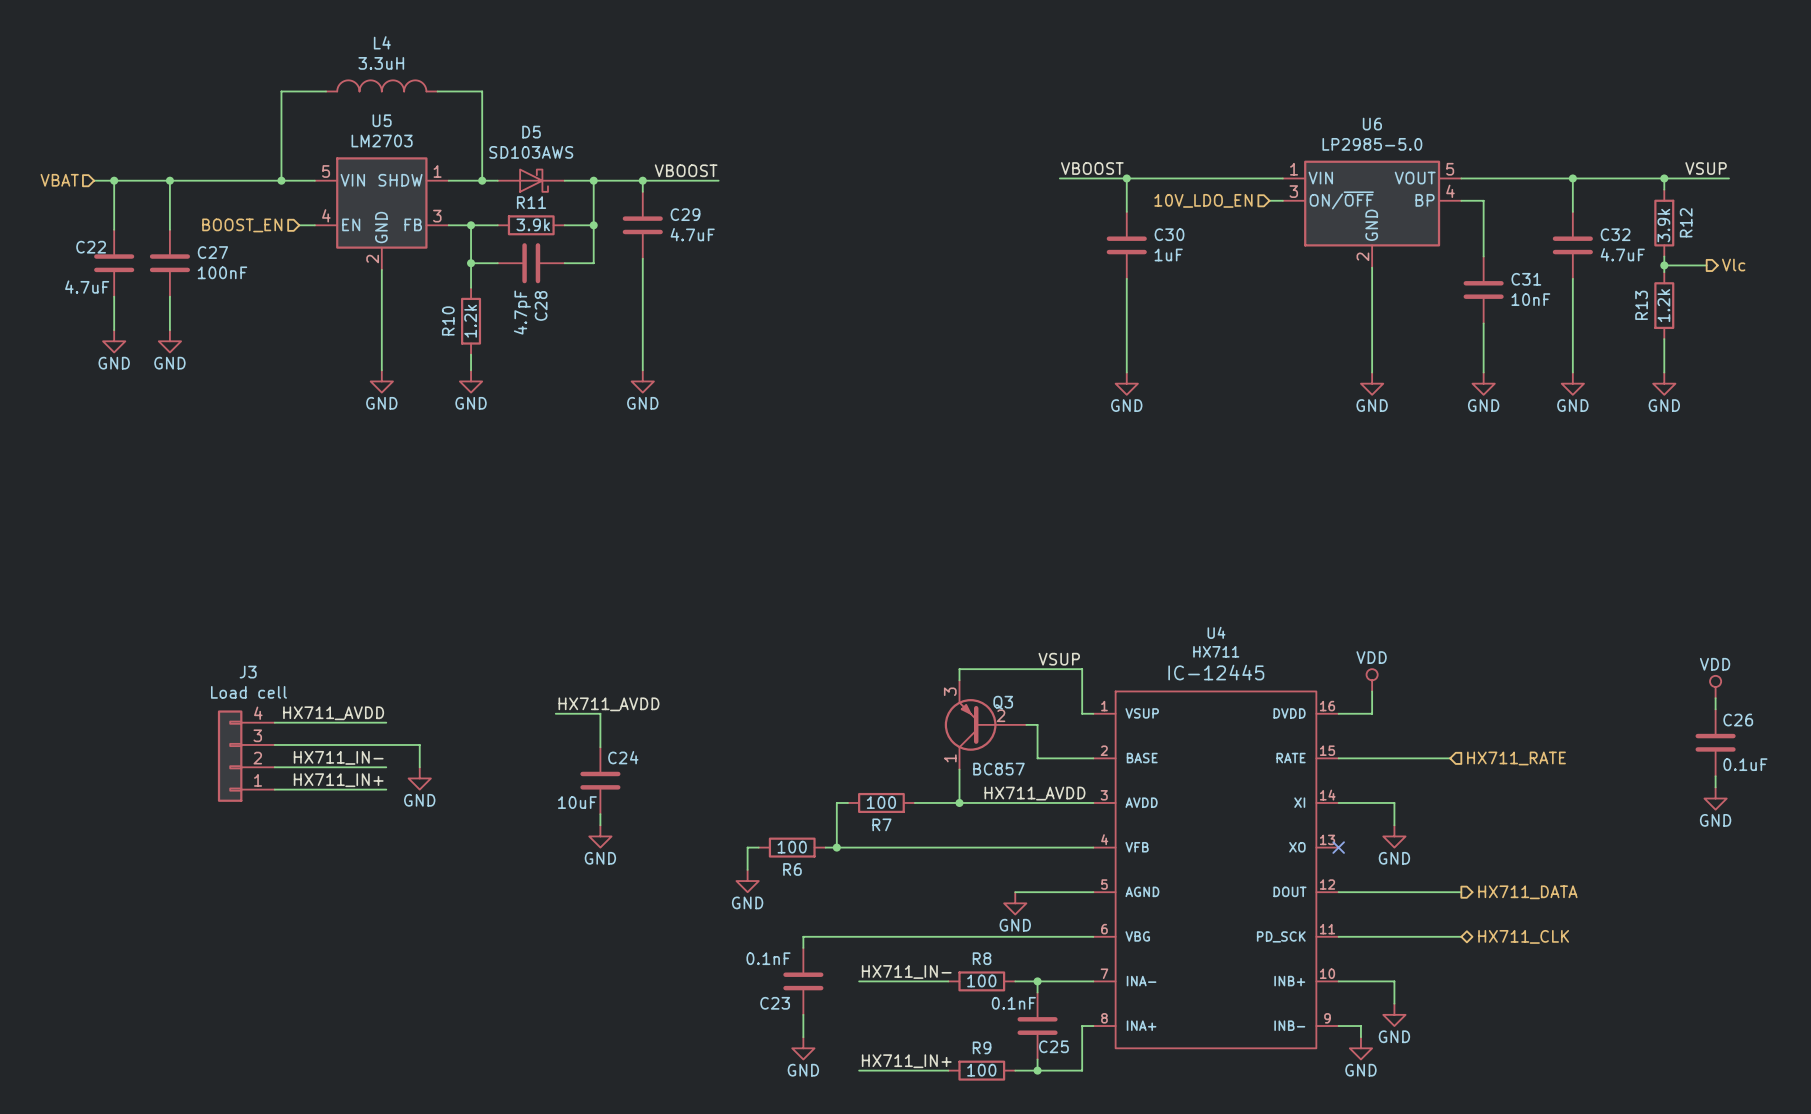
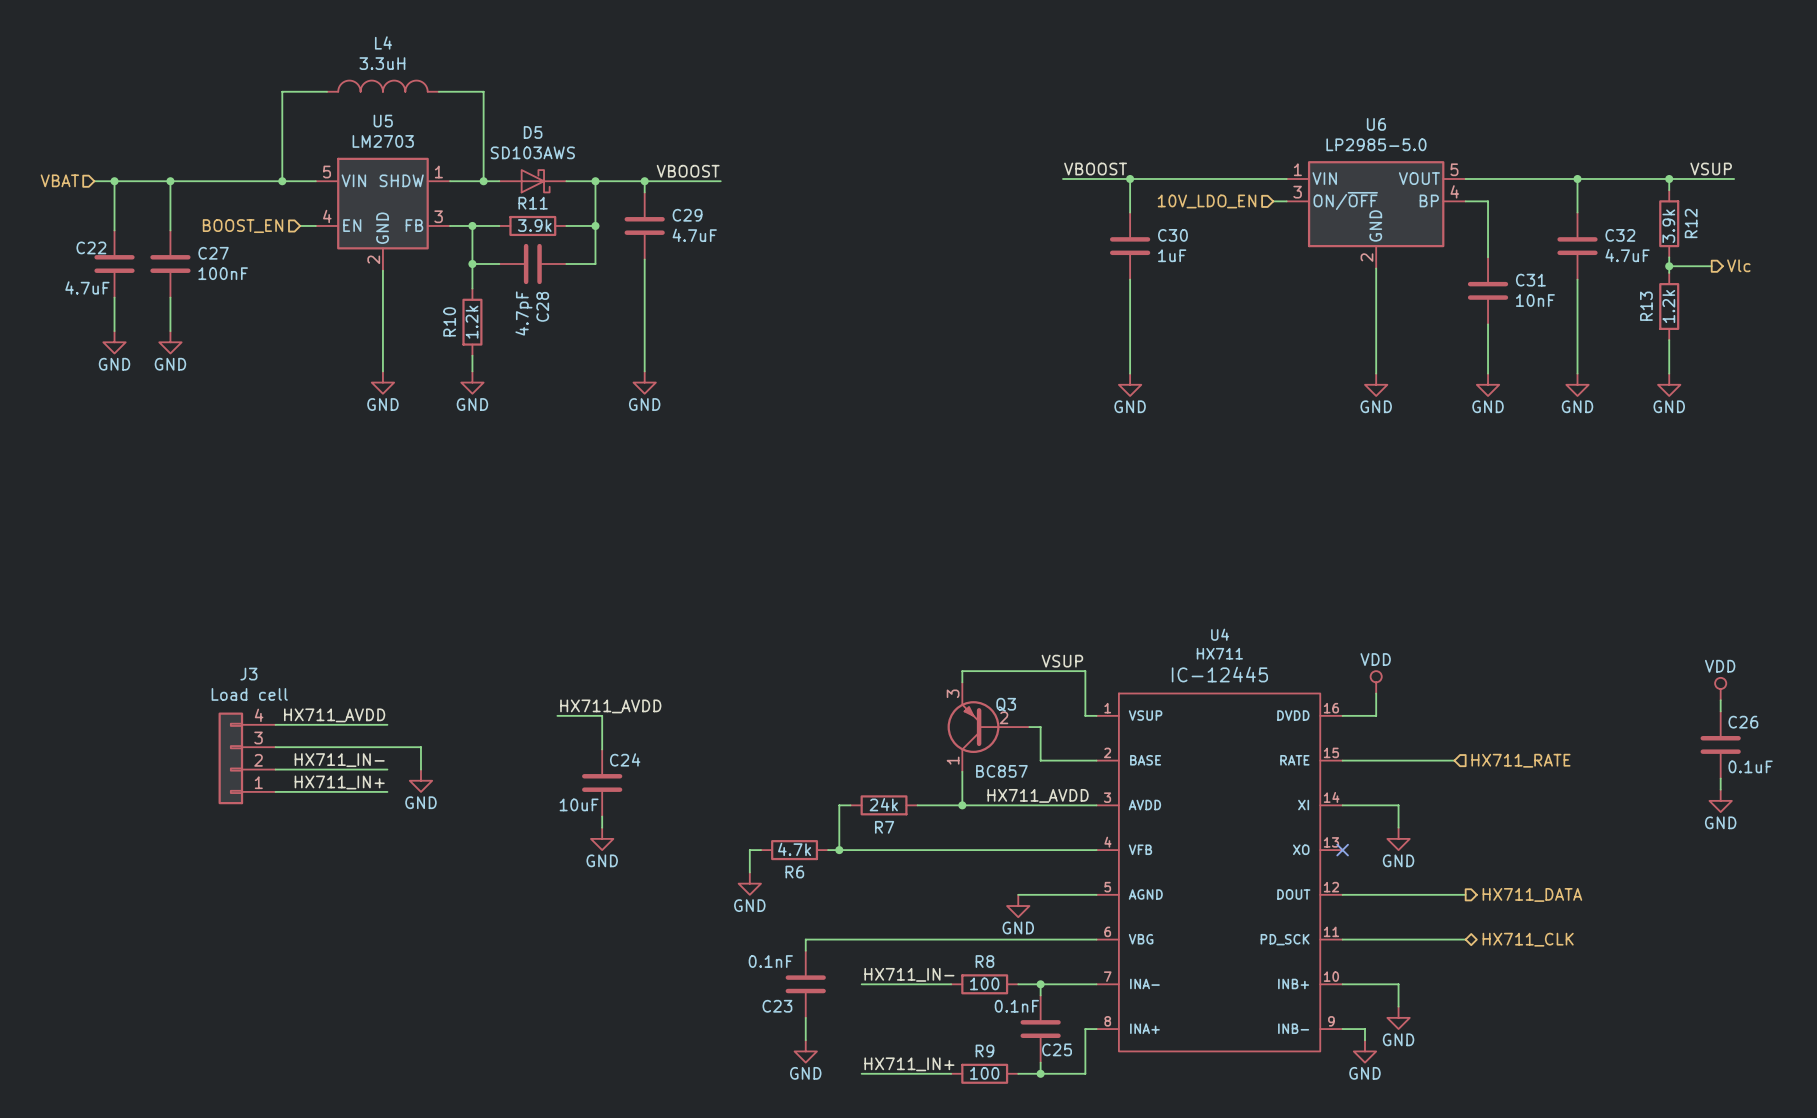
R7 value: 100 (881, 802) -> 24k (883, 804)
R6 value: 100 (792, 847) -> 4.7k (794, 849)

